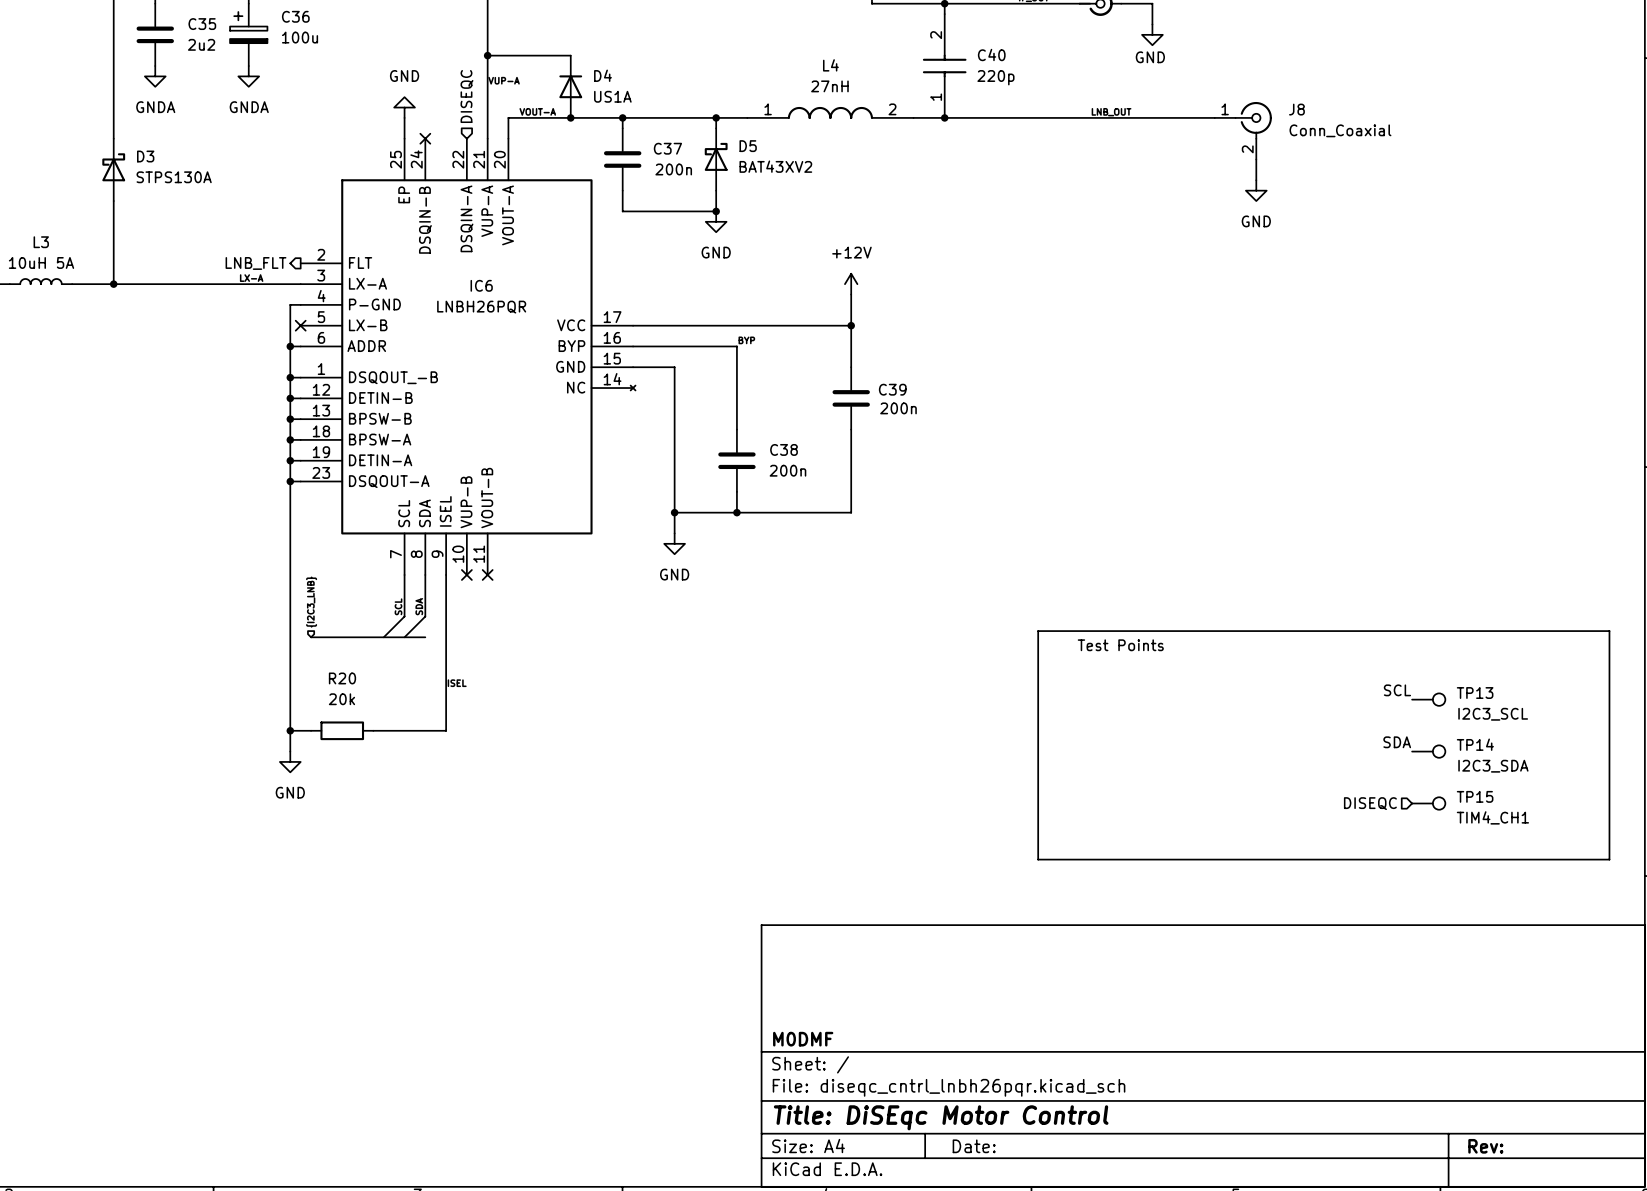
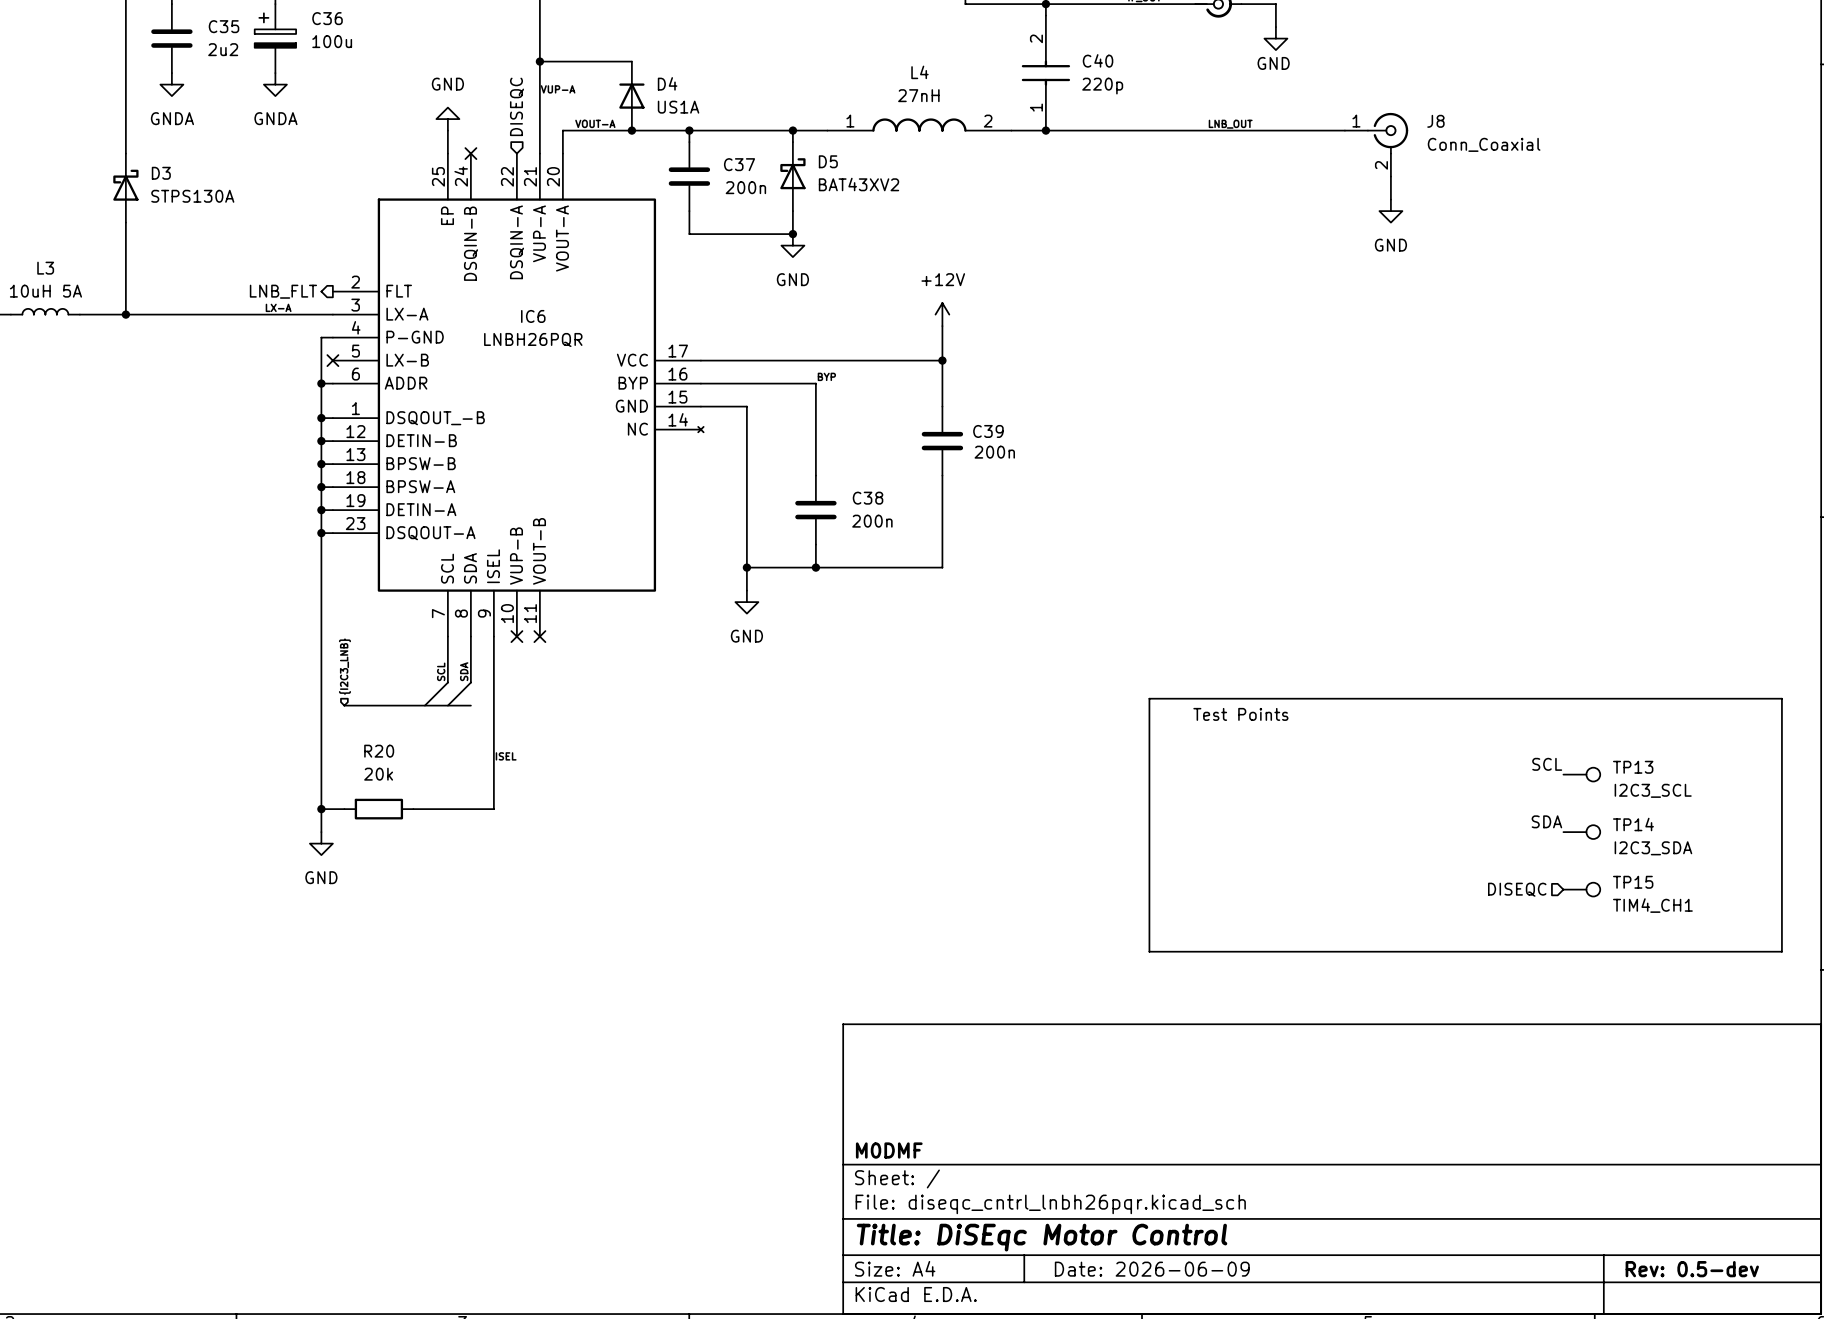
title block: Date: (974, 1146) -> Date: 2026-06-09 (1152, 1269)
title block: Rev: (1485, 1146) -> Rev: 0.5-dev (1692, 1269)

